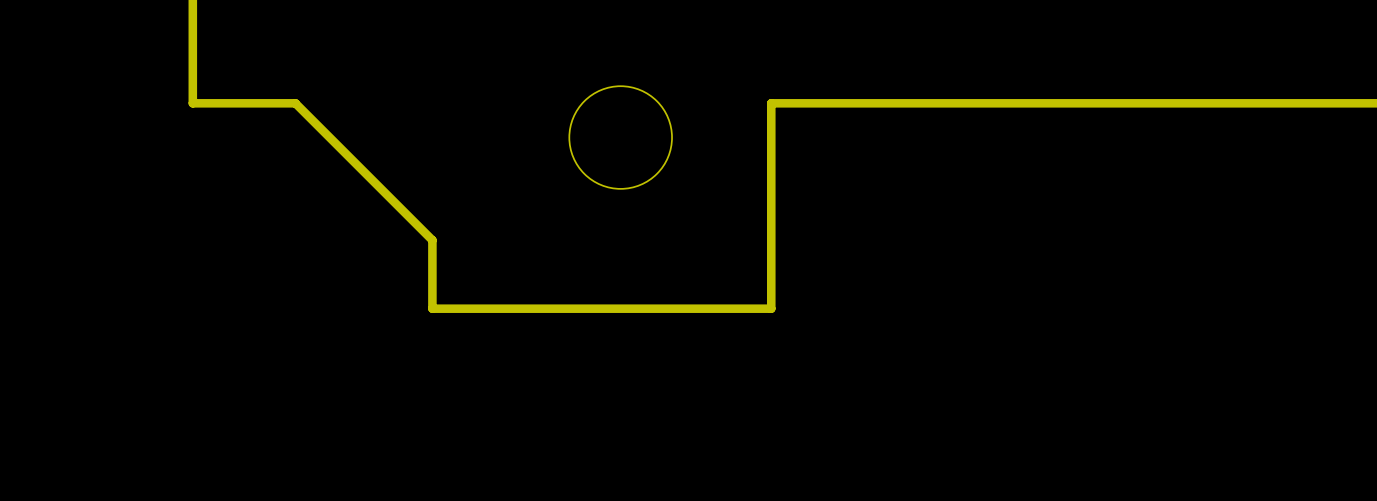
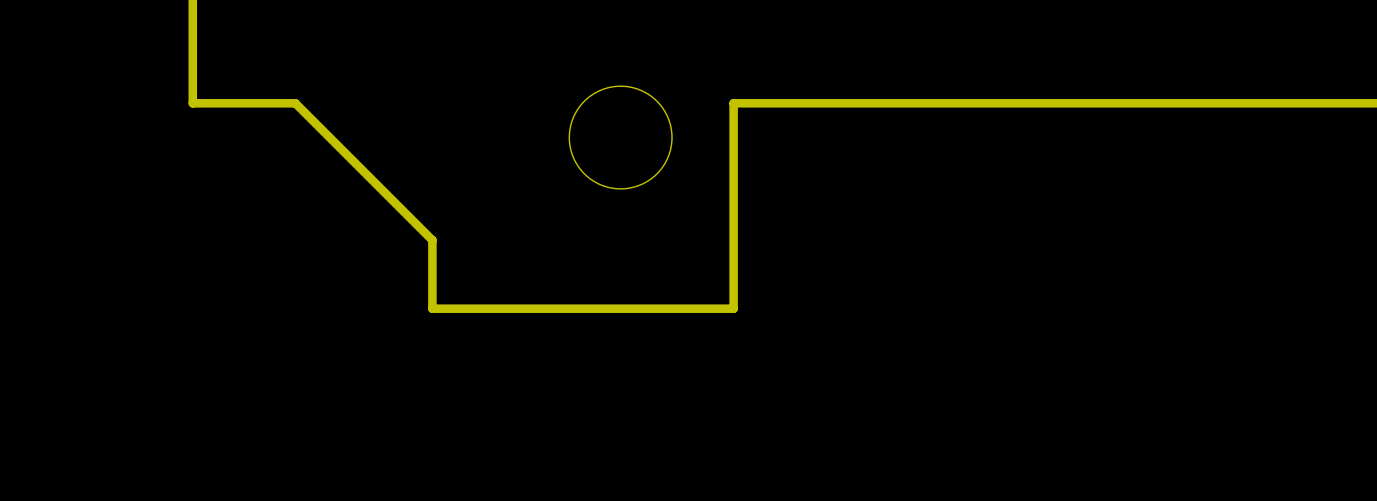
board edge: (771, 103) (771, 308) (733, 308) -> (771, 103) (733, 103) (733, 308)

